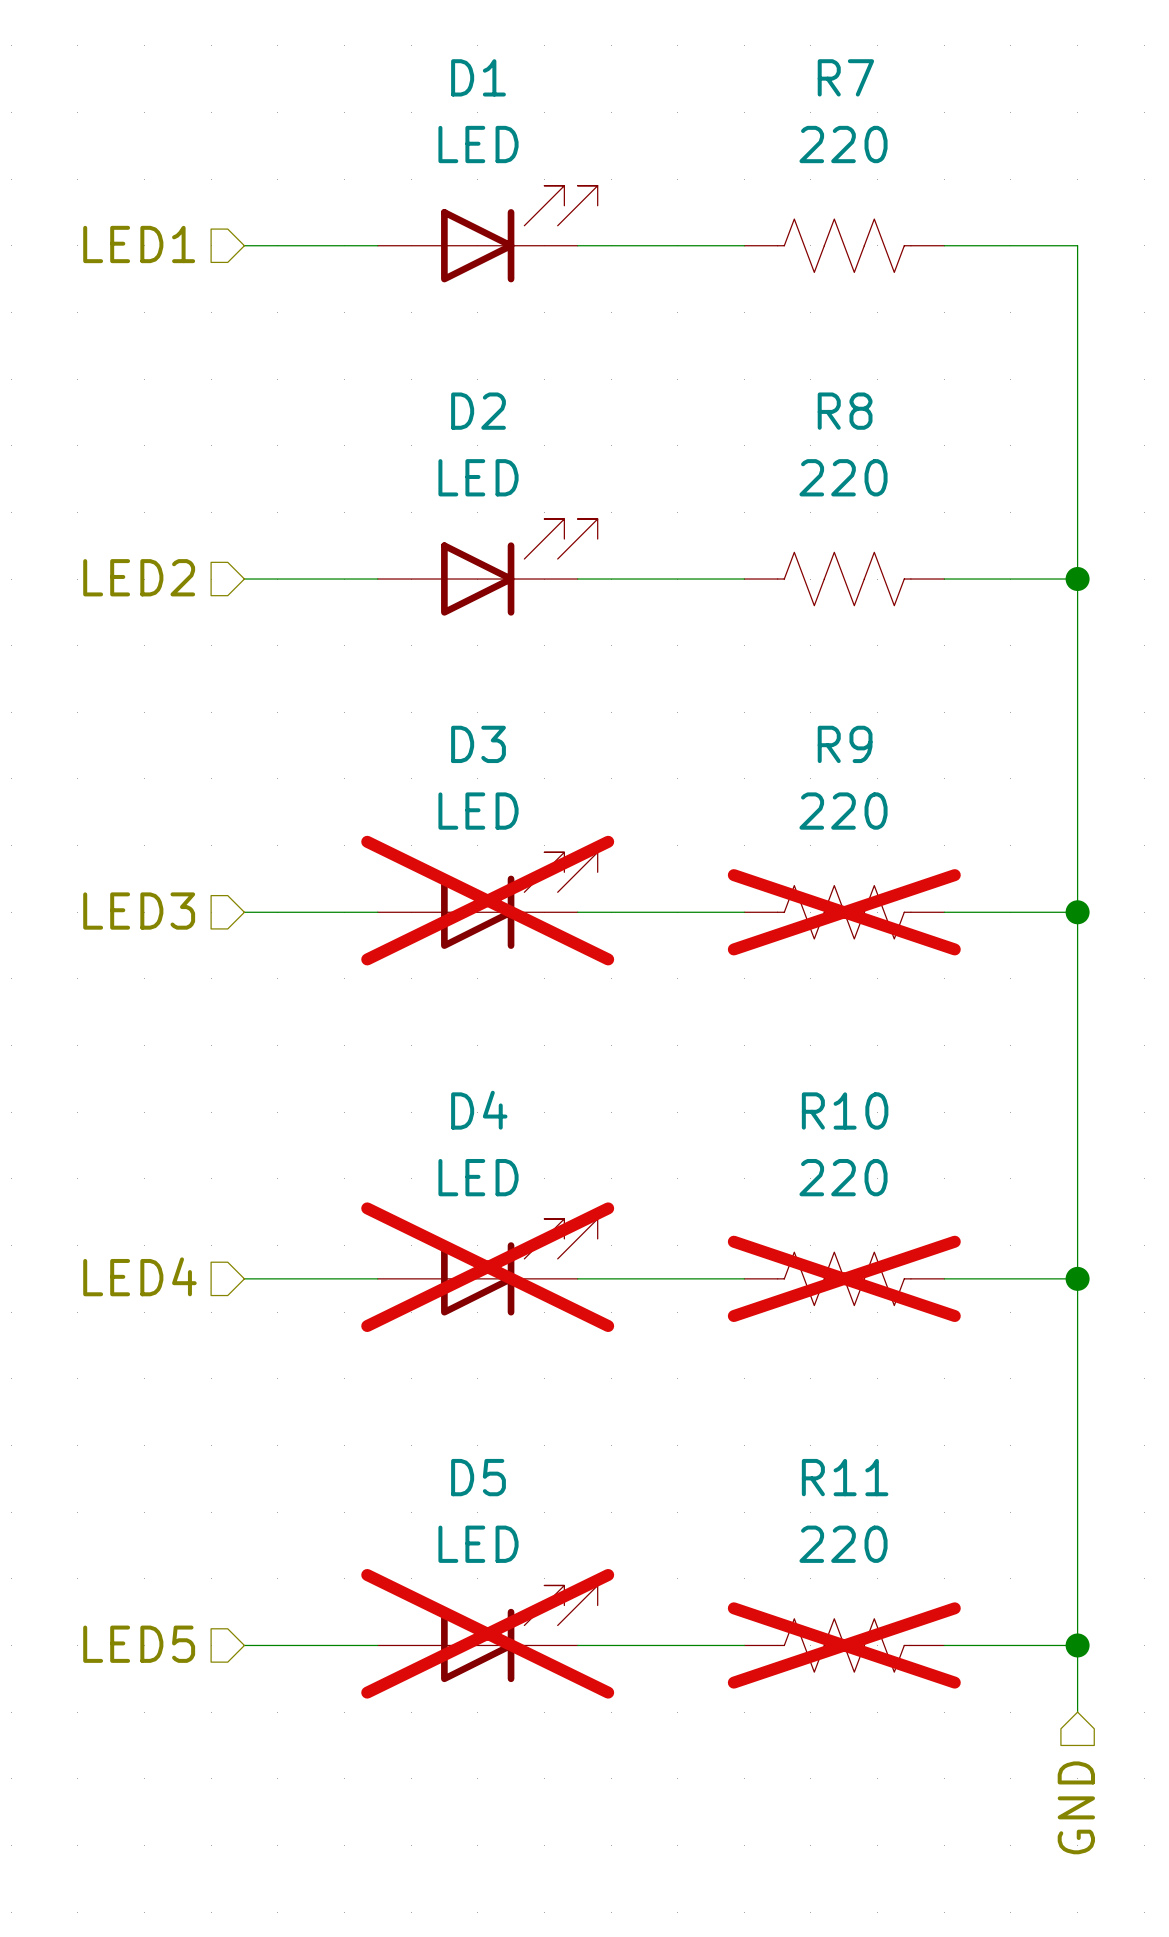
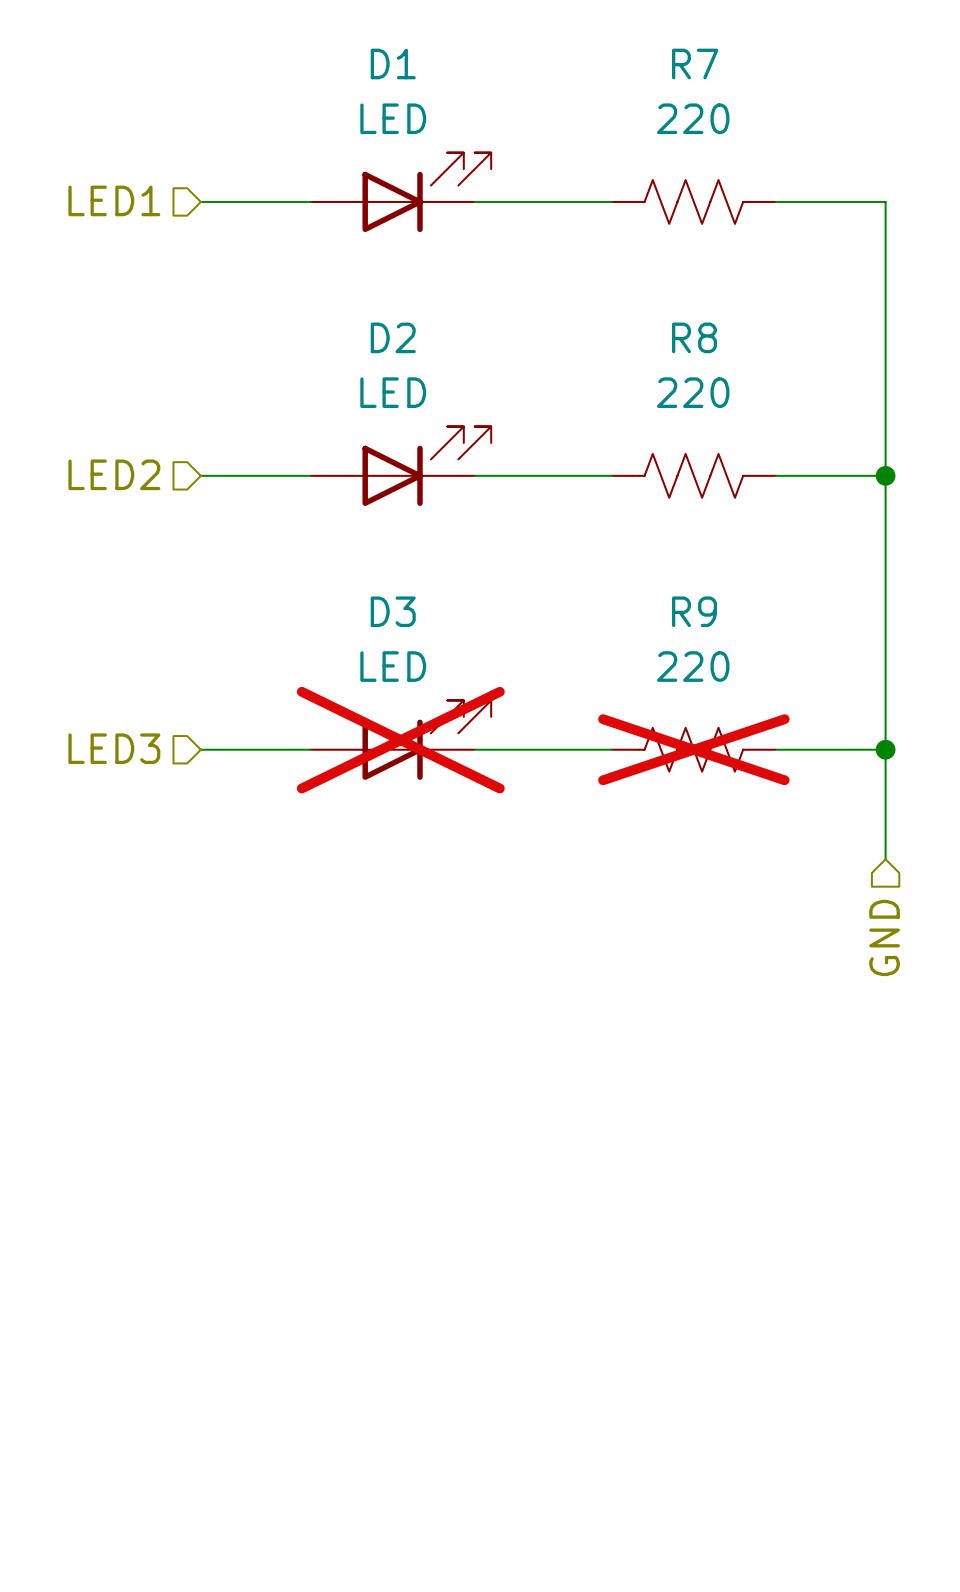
wire: (1077, 1045) (1077, 1712) -> none
hierarchical label: none -> GND (884, 937)
D4: LED (487, 1267) -> none
hierarchical label: LED4 (139, 1276) -> none
wire: (244, 1278) (377, 1278) -> none
wire: (577, 1278) (744, 1278) -> none
R10: 220 (844, 1278) -> none
wire: (944, 1278) (1077, 1278) -> none
junction: (1077, 1278) -> none
D5: LED (487, 1633) -> none
hierarchical label: LED5 (139, 1644) -> none
wire: (244, 1645) (377, 1645) -> none
wire: (577, 1645) (744, 1645) -> none
R11: 220 (844, 1645) -> none
wire: (944, 1645) (1077, 1645) -> none
junction: (1077, 1645) -> none
hierarchical label: GND (1076, 1807) -> none

